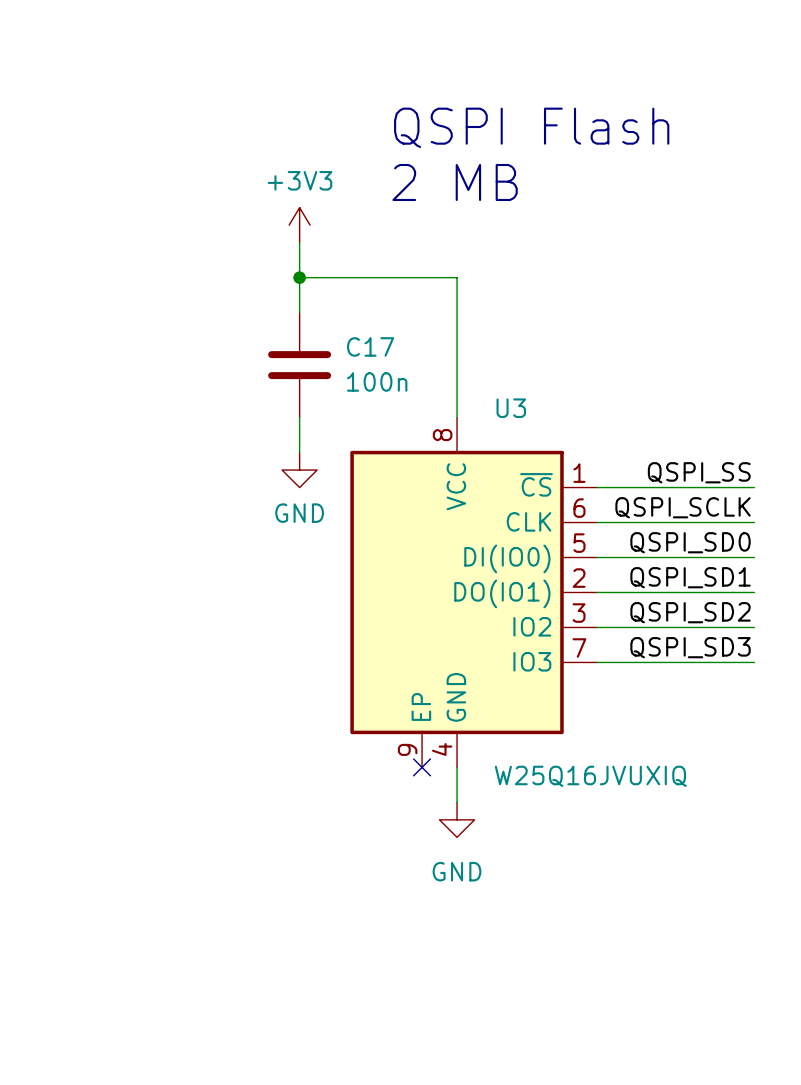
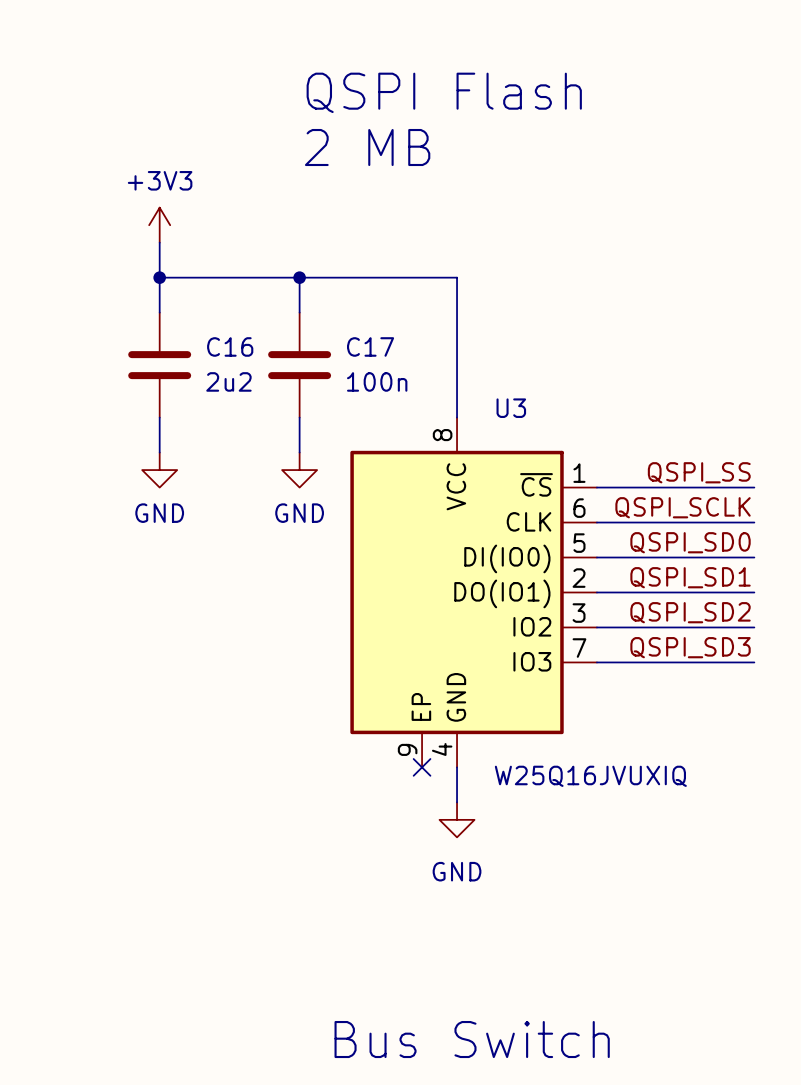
text position: QSPI Flash (531, 127) -> QSPI Flash (444, 92)
text position: 2 MB (455, 182) -> 2 MB (367, 147)
power symbol position: +3V3 (299, 225) -> +3V3 (159, 225)
wire: none -> (159, 242) (159, 312)
wire: (299, 242) (299, 277) -> (159, 277) (299, 277)
junction: none -> (159, 277)
C16: none -> 2u2 (159, 365)
wire: none -> (159, 417) (159, 452)
power symbol: none -> GND (159, 470)
text: none -> Bus Switch (472, 1039)

